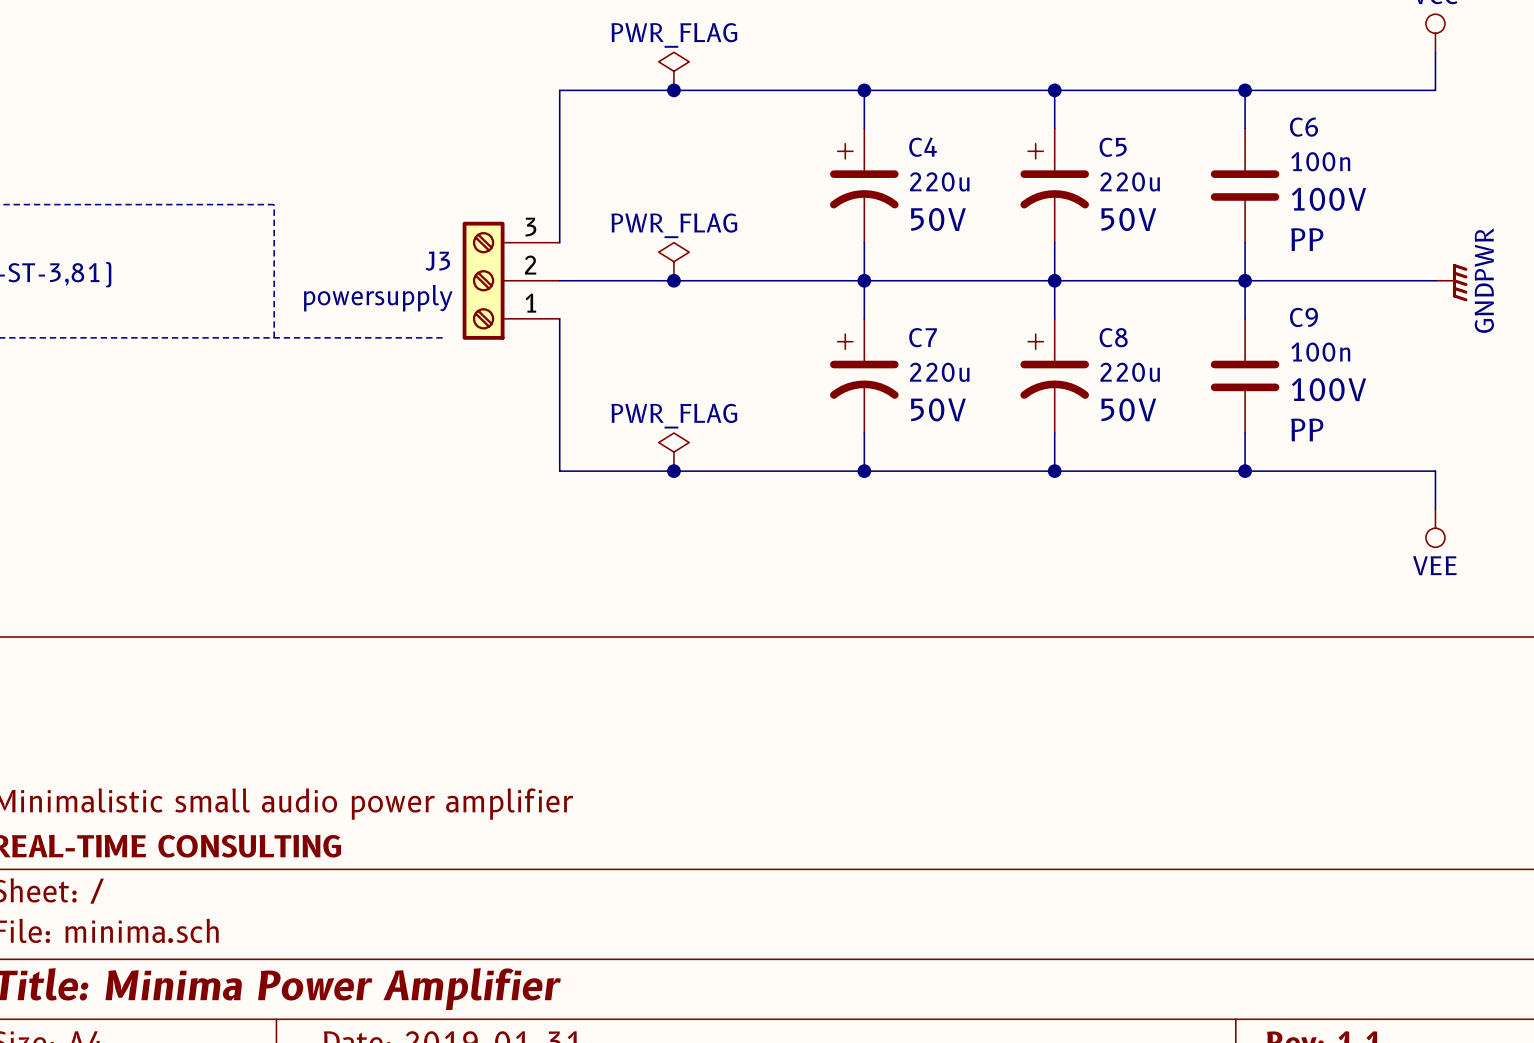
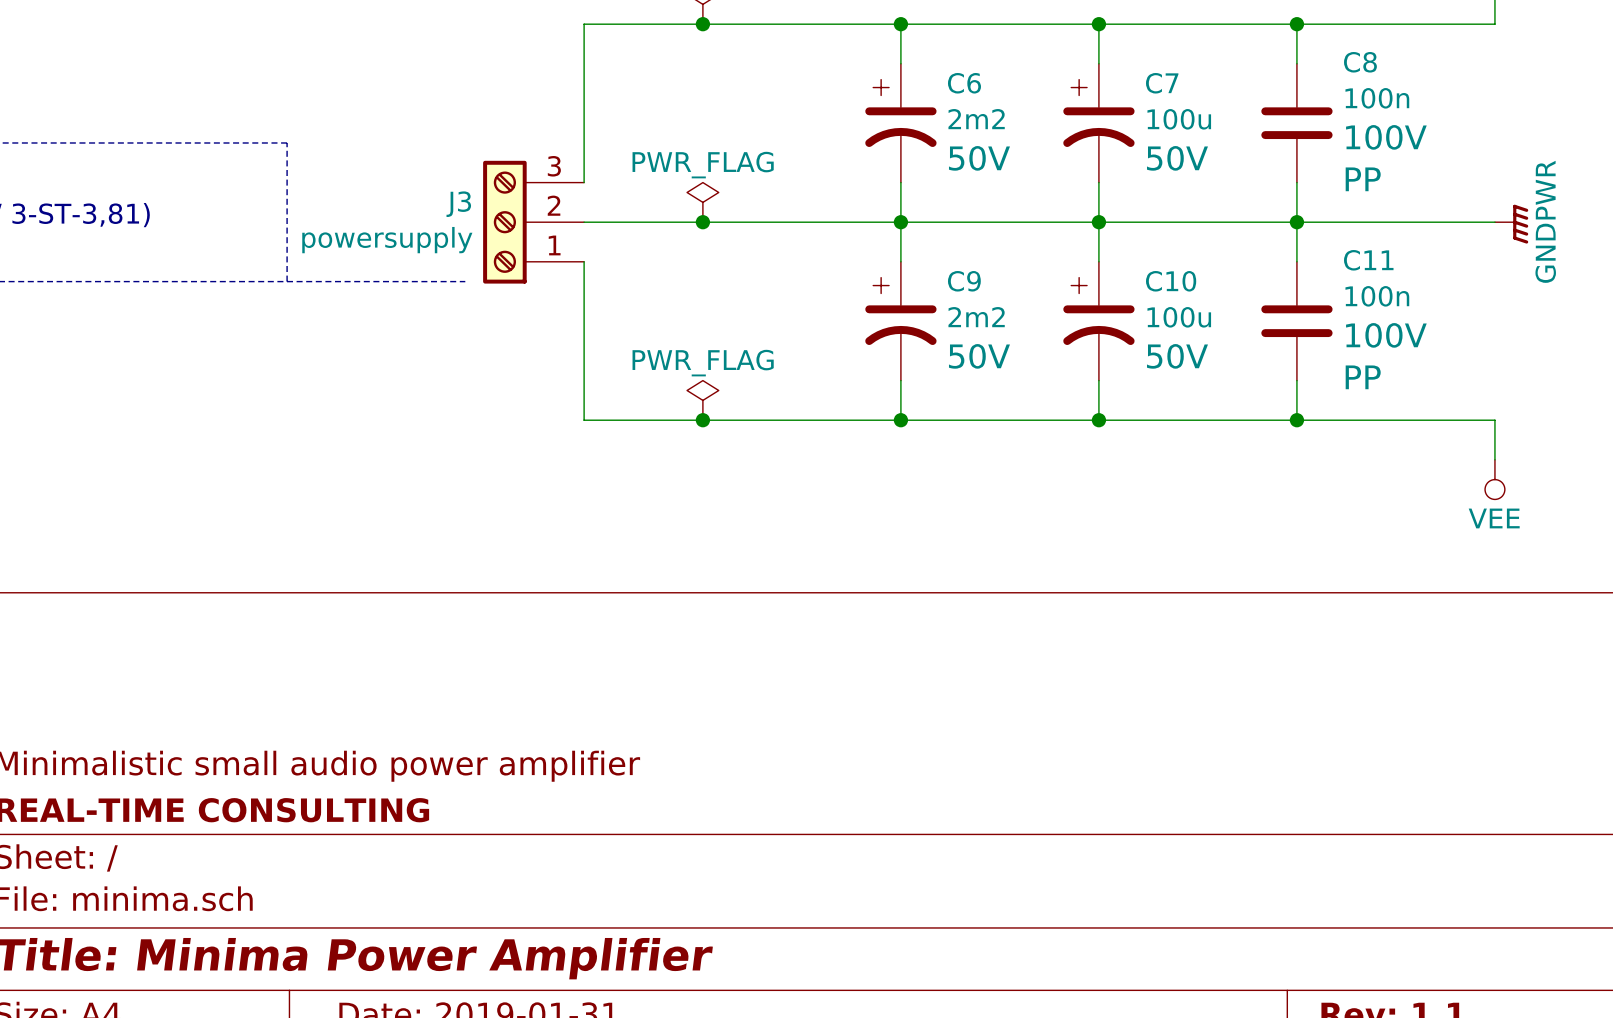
C6 name: C6 (1303, 127) -> C8 (1360, 62)
C4 name: C4 (923, 147) -> C6 (964, 83)
C5 name: C5 (1113, 147) -> C7 (1162, 83)
C4 value: 220u (939, 181) -> 2m2 (976, 119)
C5 value: 220u (1130, 181) -> 100u (1179, 119)
C9 name: C9 (1303, 317) -> C11 (1368, 260)
C7 name: C7 (923, 337) -> C9 (964, 281)
C8 name: C8 (1113, 337) -> C10 (1171, 281)
C7 value: 220u (939, 372) -> 2m2 (976, 317)
C8 value: 220u (1130, 372) -> 100u (1179, 317)

